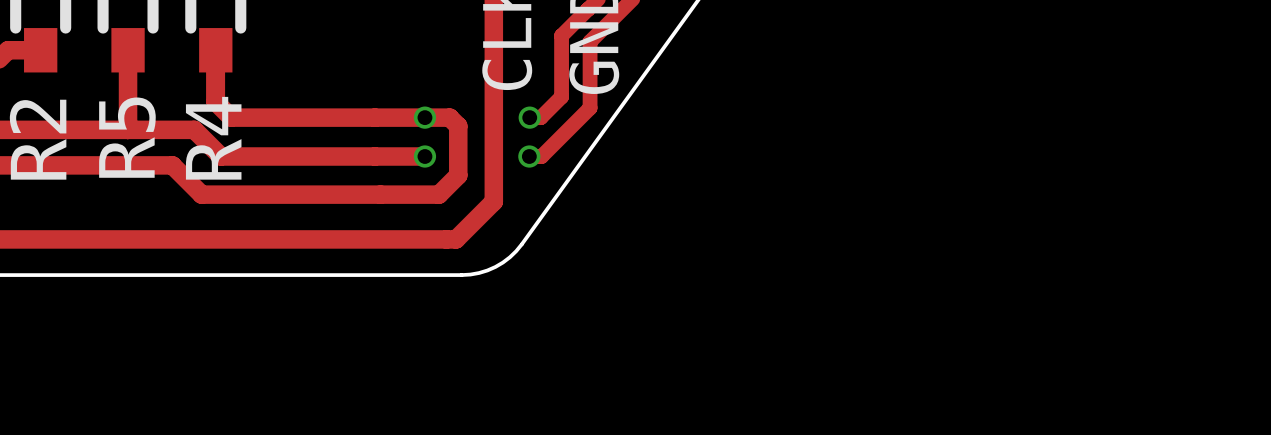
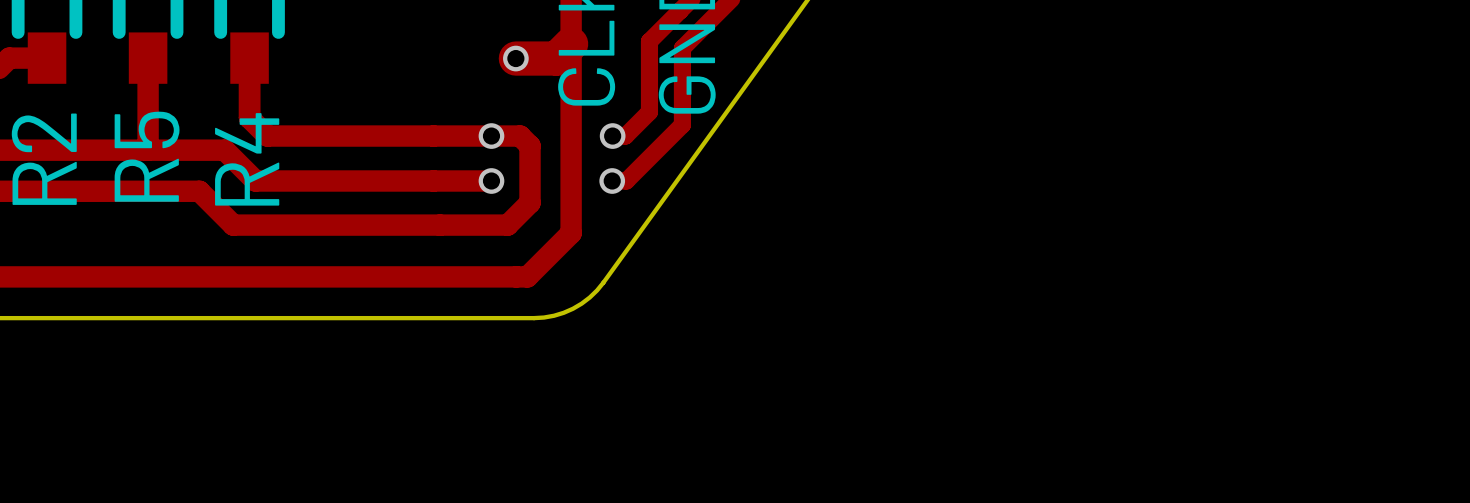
track: none -> (571, 43) (556, 58) (515, 58)
via: none -> (515, 58)

